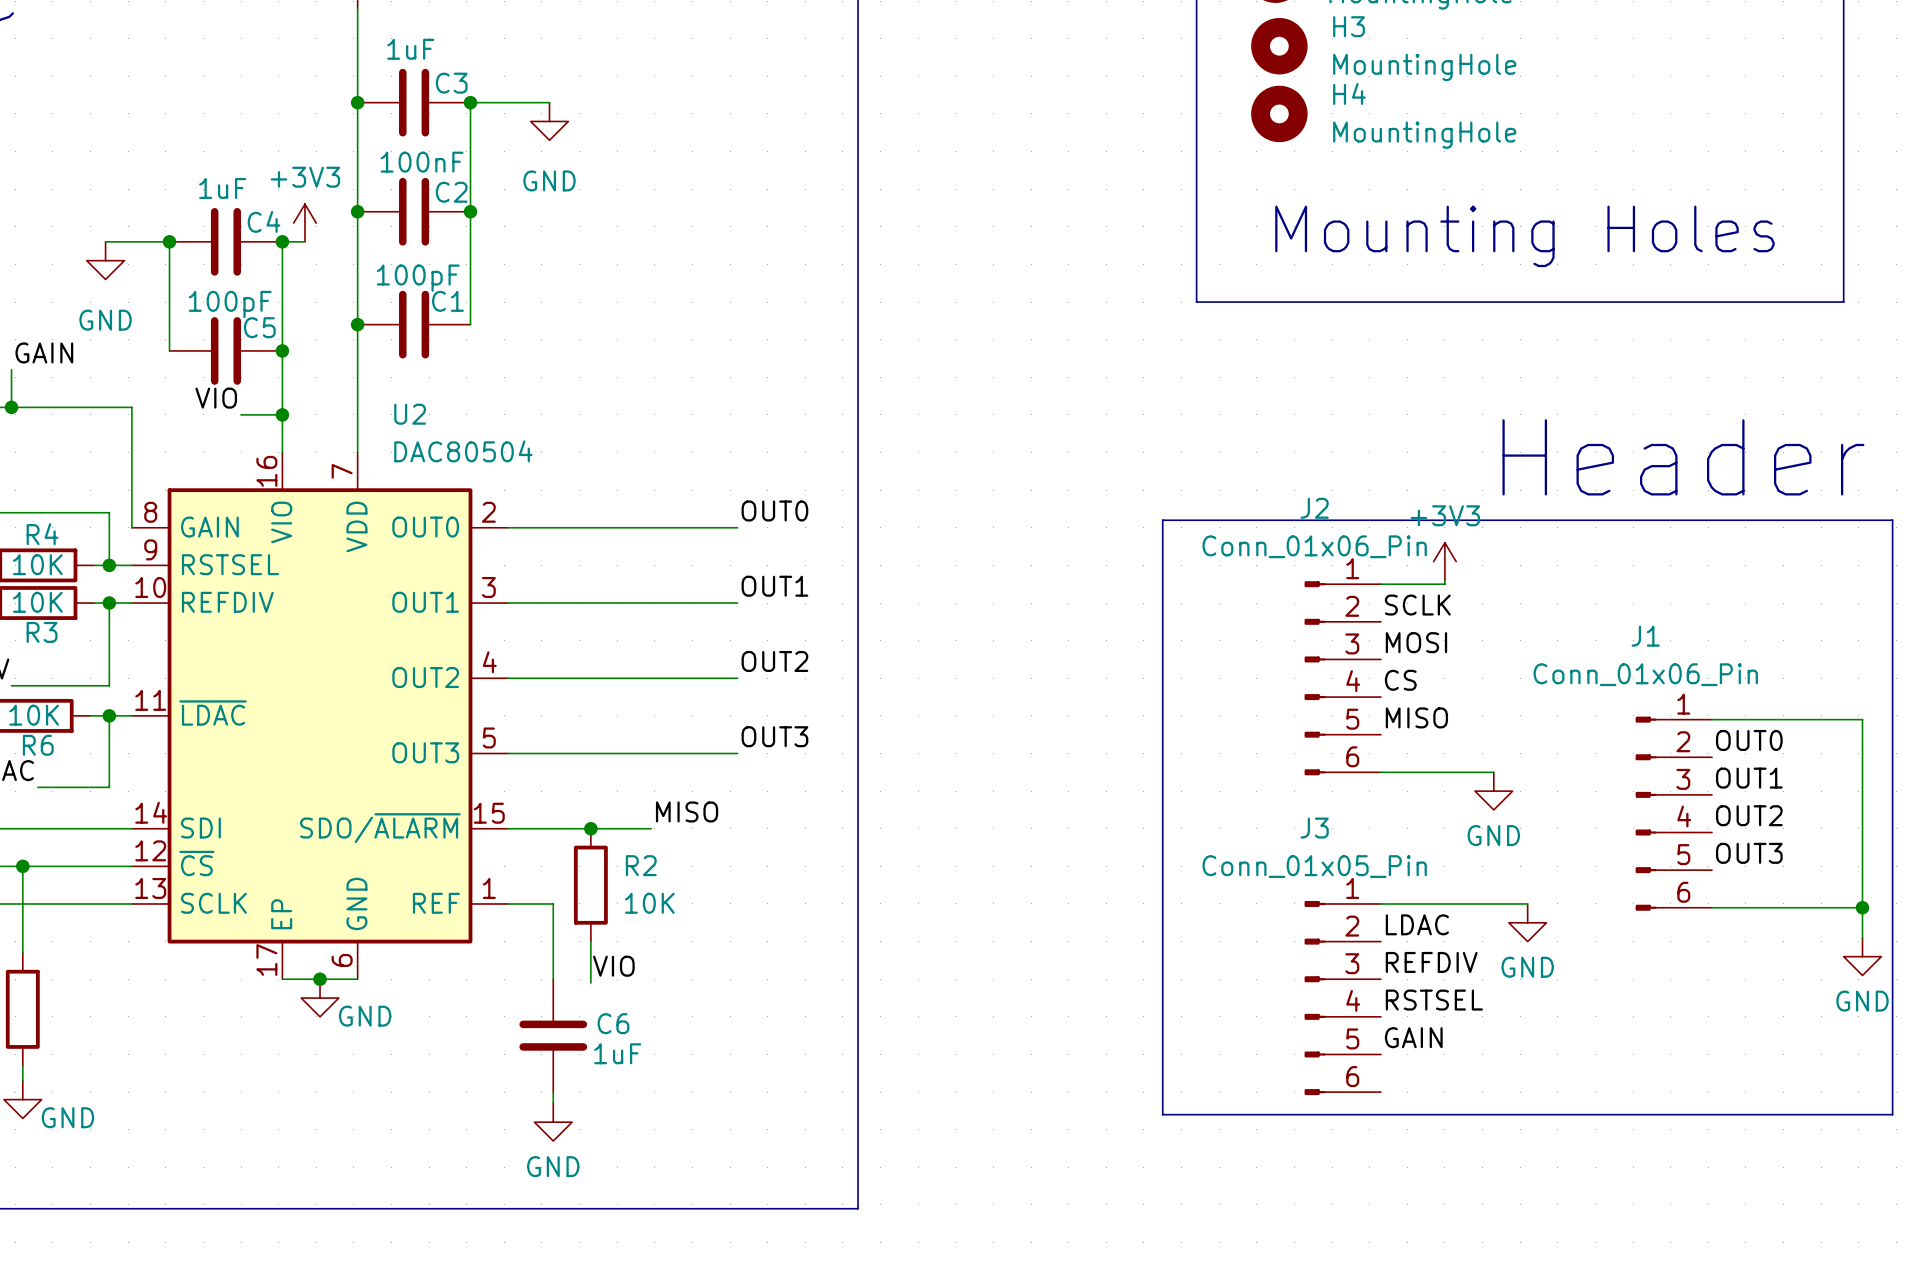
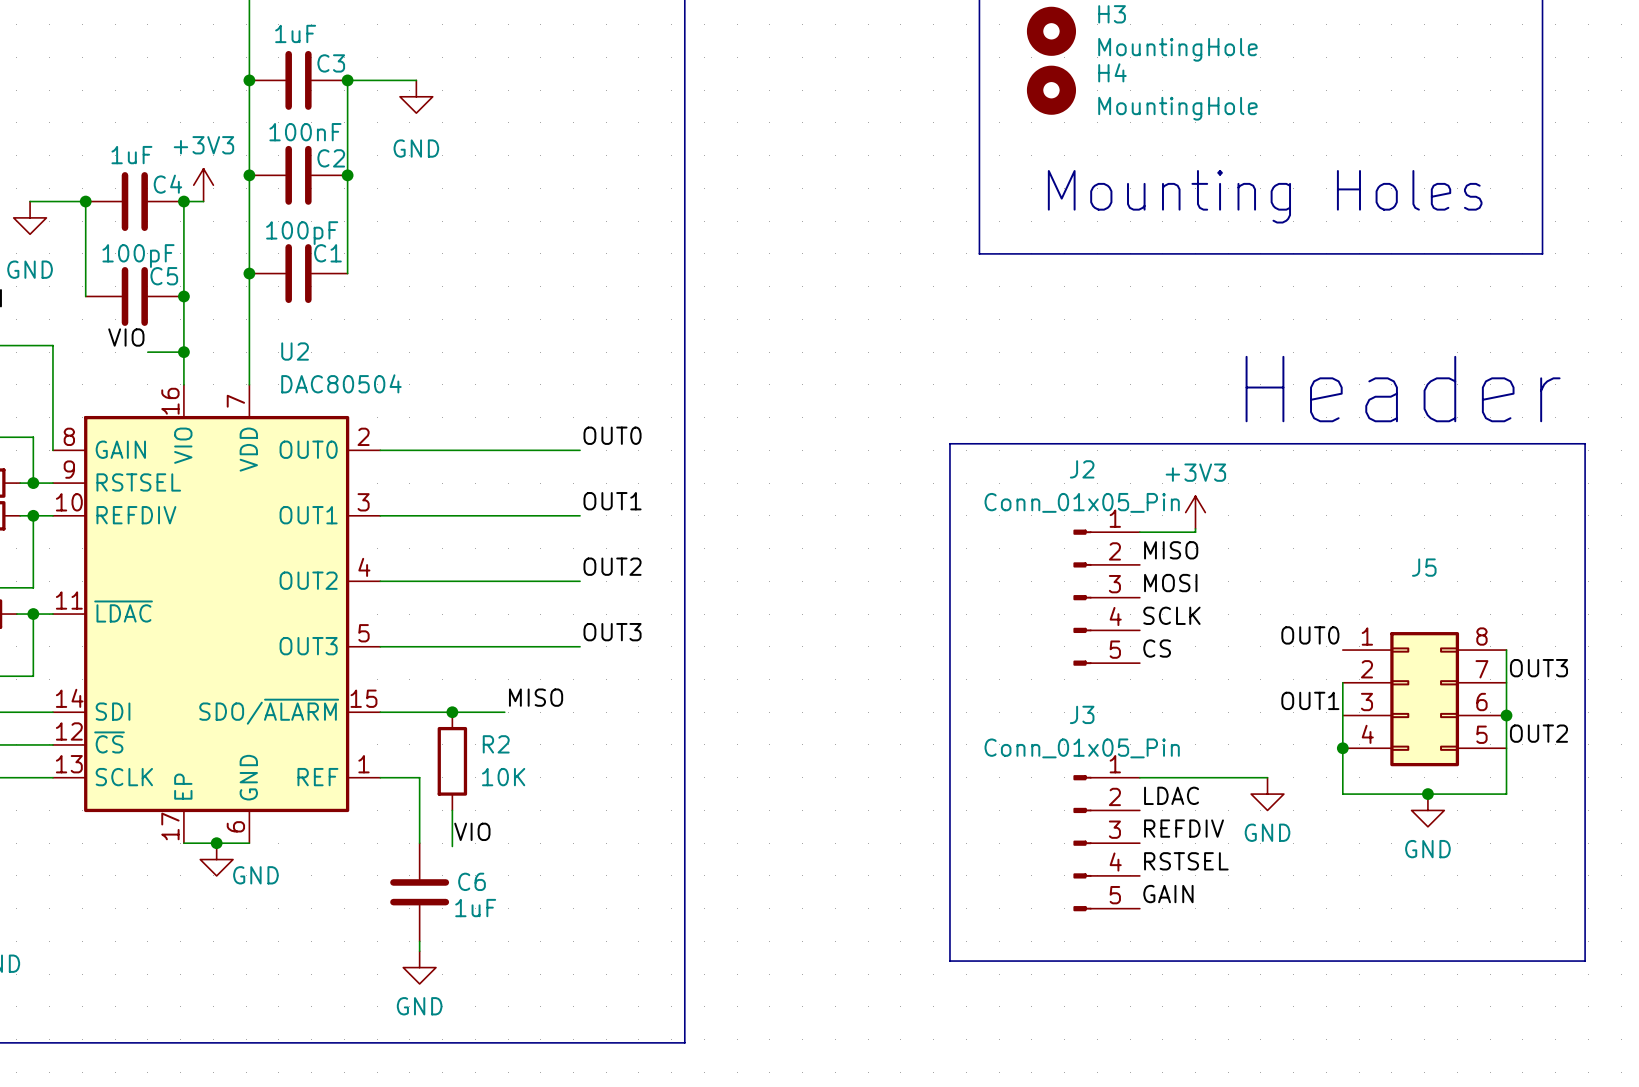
J2 value: Conn_01x06_Pin (1314, 546) -> Conn_01x05_Pin (1082, 502)
power symbol position: +3V3 (1444, 561) -> +3V3 (1195, 512)
wire: (1444, 580) (1444, 584) (1380, 584) -> (1195, 528) (1195, 532) (1139, 532)
J2 symbol: [1304, 581, 1381, 776] -> [1073, 529, 1140, 666]
label: SCLK (1417, 605) -> none
label: MOSI (1416, 642) -> MISO (1171, 550)
label: CS (1400, 680) -> MOSI (1170, 583)
label: MISO (1416, 717) -> SCLK (1171, 615)
wire: (1712, 719) (1862, 719) (1862, 937) -> none
label position: OUT0 (1749, 740) -> OUT0 (1310, 635)
label: none -> CS (1157, 648)
wire: none -> (1506, 650) (1506, 794) (1342, 794) (1342, 682)
wire: (1380, 772) (1493, 772) -> none
label position: OUT1 (1749, 778) -> OUT1 (1310, 700)
power symbol: GND (1493, 791) -> none
J1: Conn_01x06_Pin (1673, 813) -> none
J5: none -> (1424, 699)
label position: OUT2 (1749, 815) -> OUT2 (1538, 733)
junction: none -> (1506, 715)
label position: OUT3 (1749, 853) -> OUT3 (1538, 668)
junction: none -> (1342, 748)
J3 symbol: [1304, 900, 1381, 1096] -> [1073, 775, 1140, 912]
wire: (1712, 907) (1862, 907) -> none
junction: (1862, 907) -> none
junction: none -> (1427, 794)
power symbol: none -> GND (1427, 810)
power symbol: GND (1862, 956) -> none

